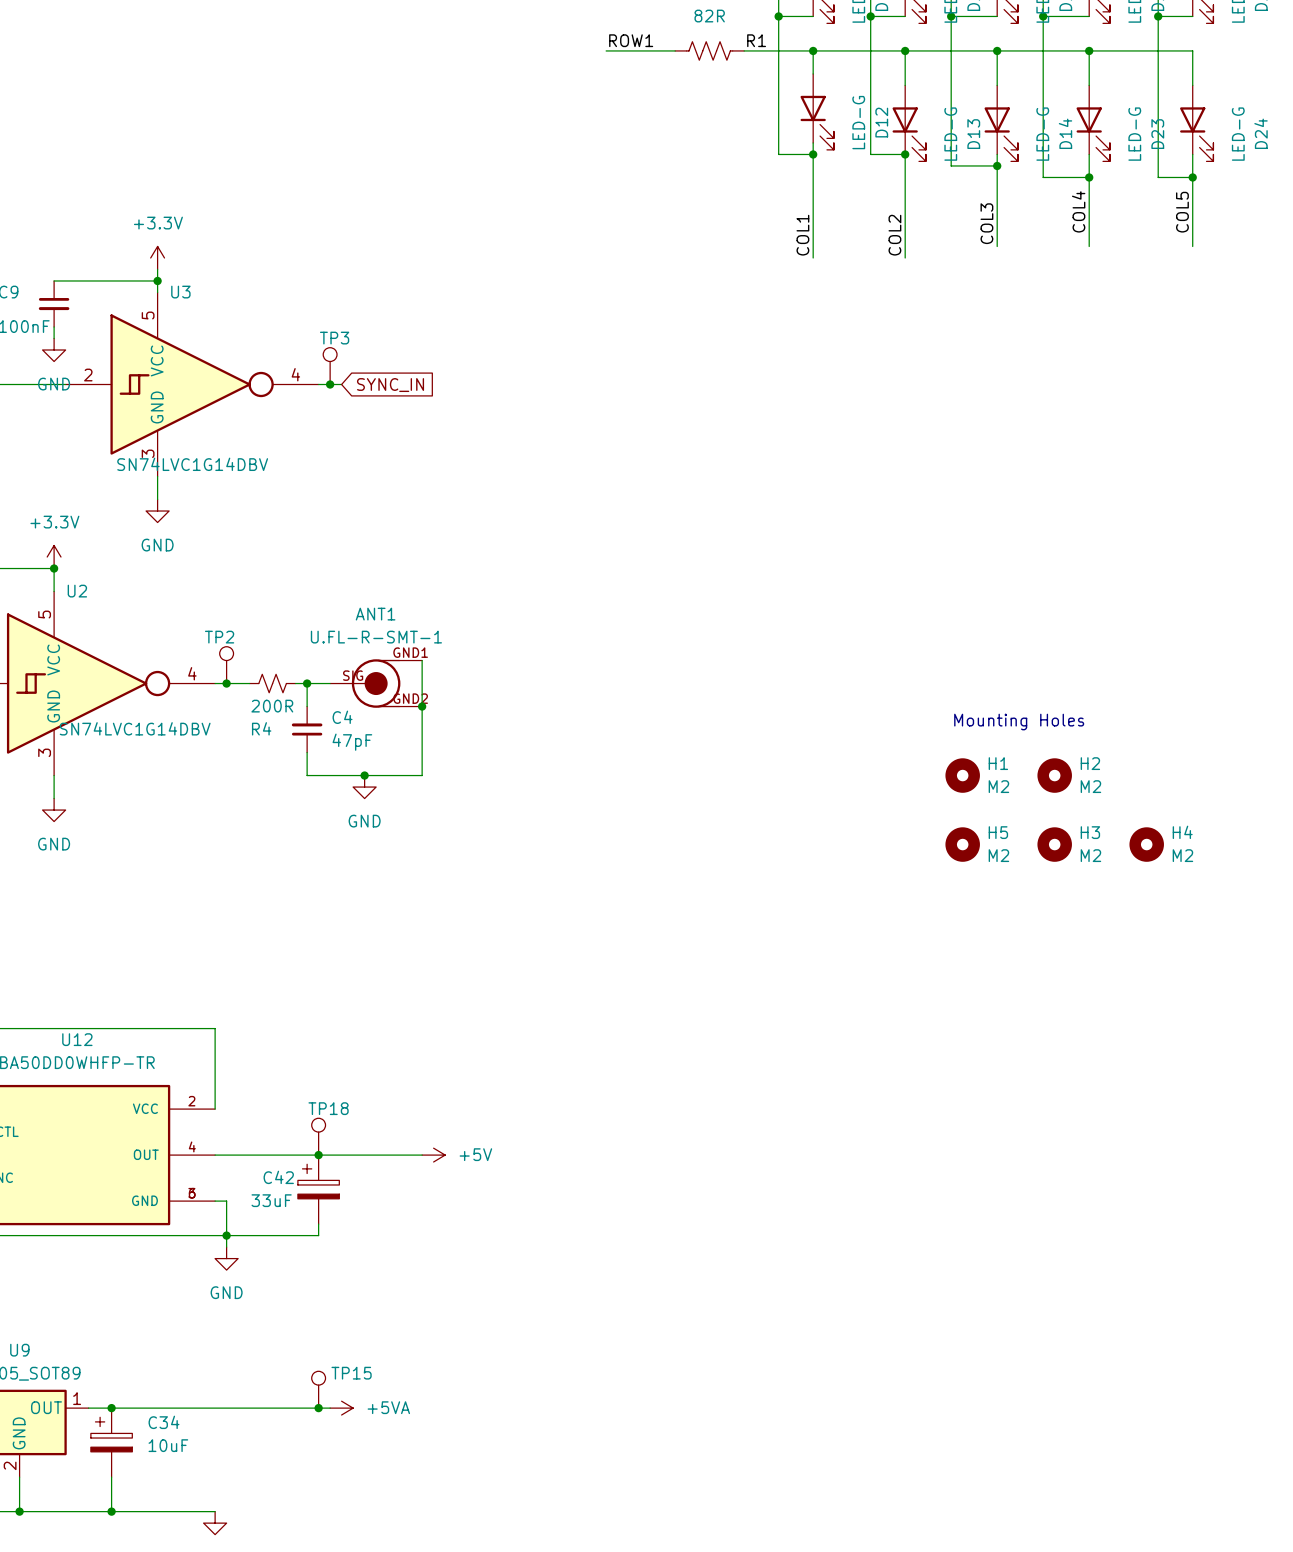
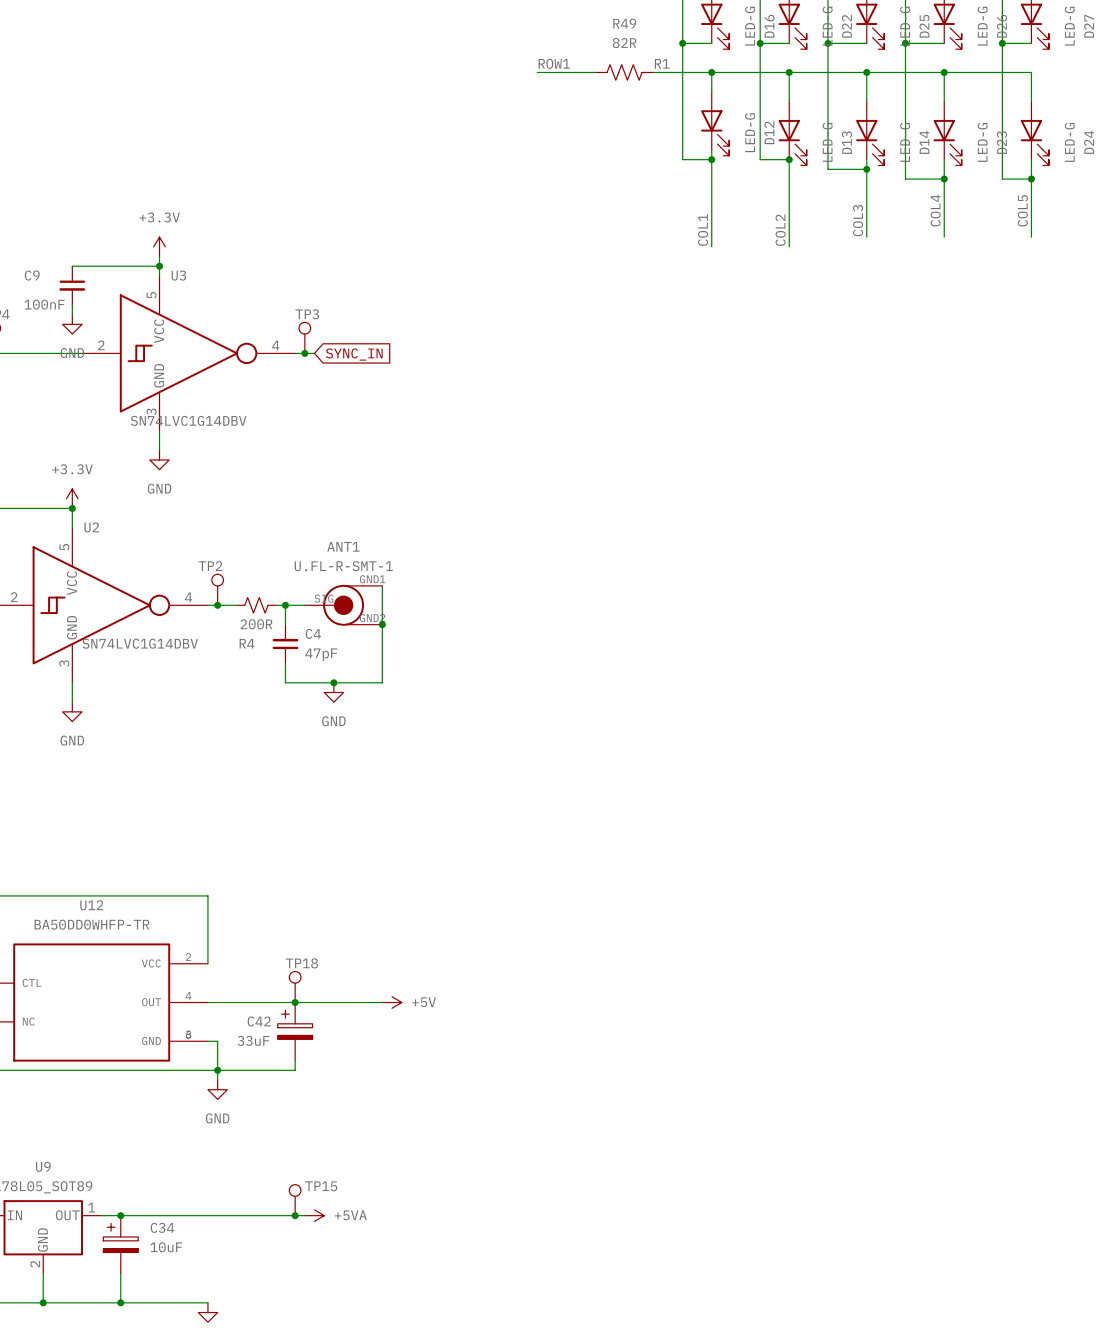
text: Mounting Holes (1019, 722) -> none
H1: M2 (962, 775) -> none
H2: M2 (1054, 775) -> none
H5: M2 (962, 844) -> none
H3: M2 (1054, 844) -> none
H4: M2 (1146, 844) -> none

